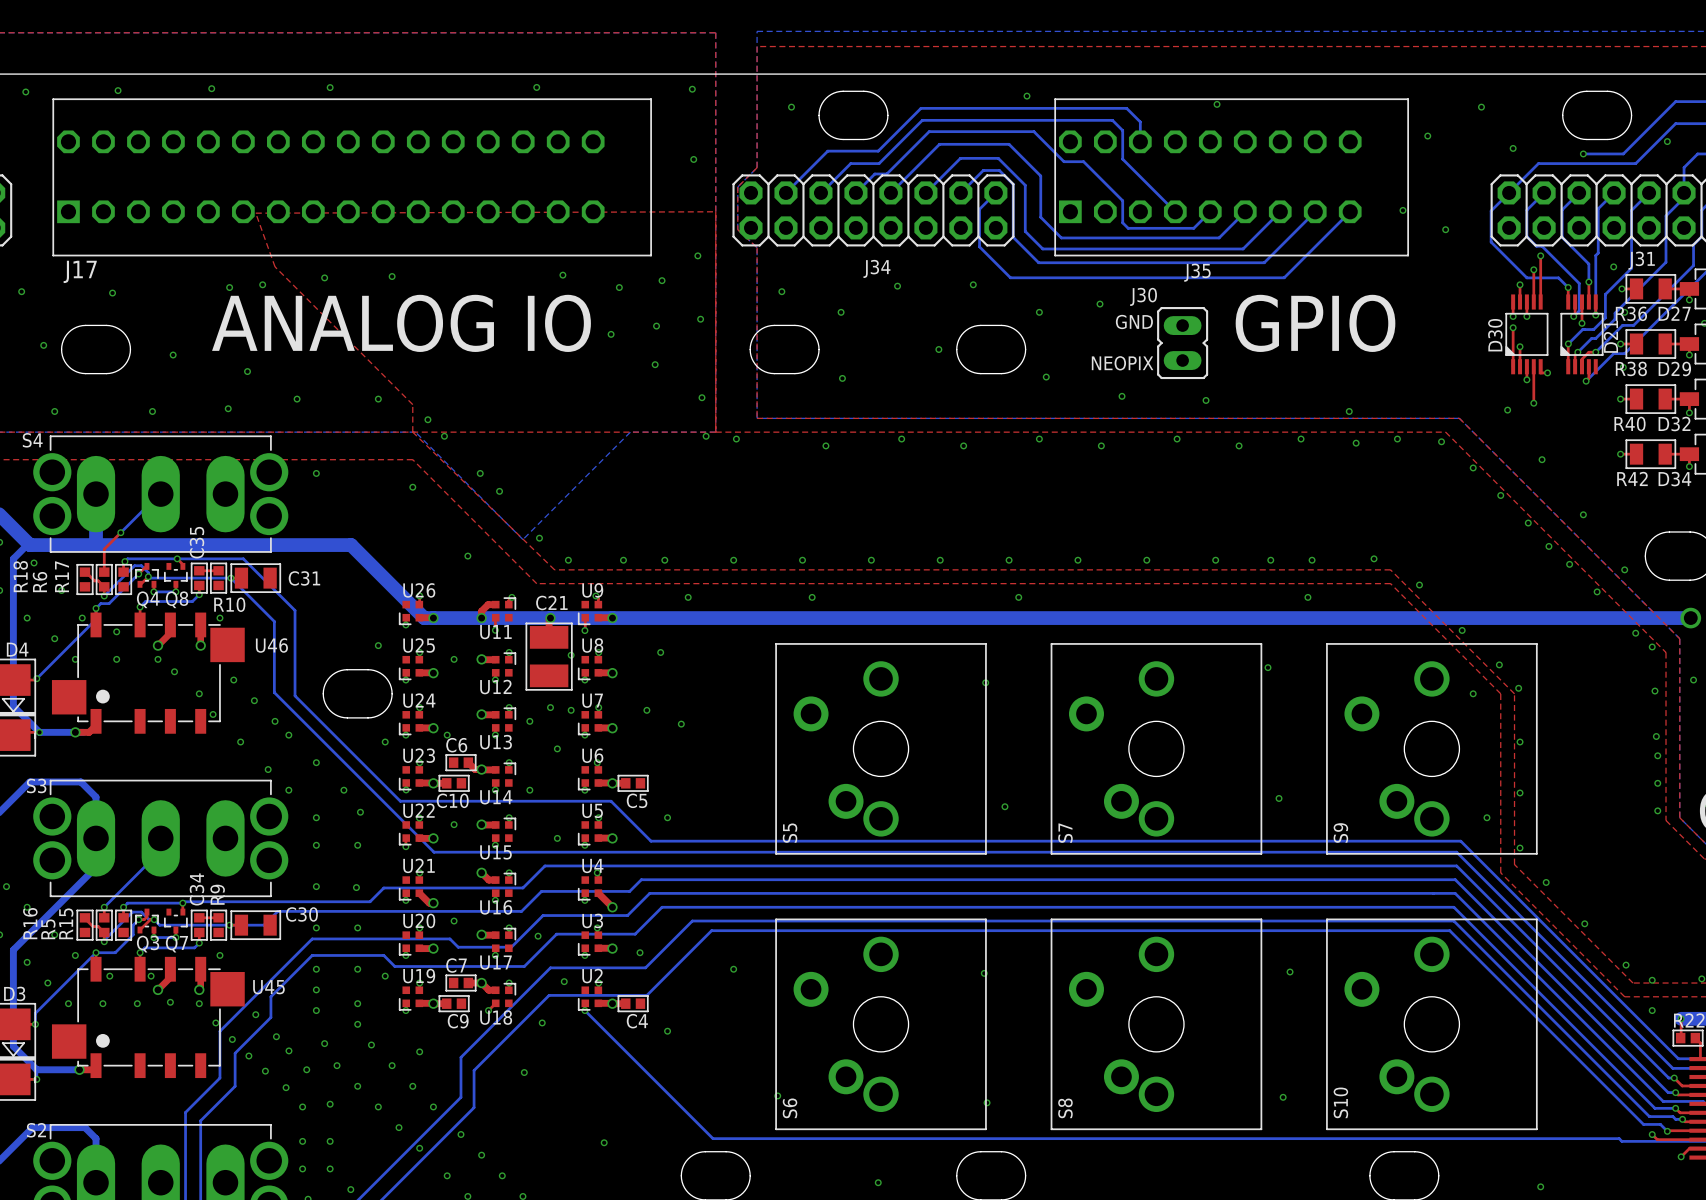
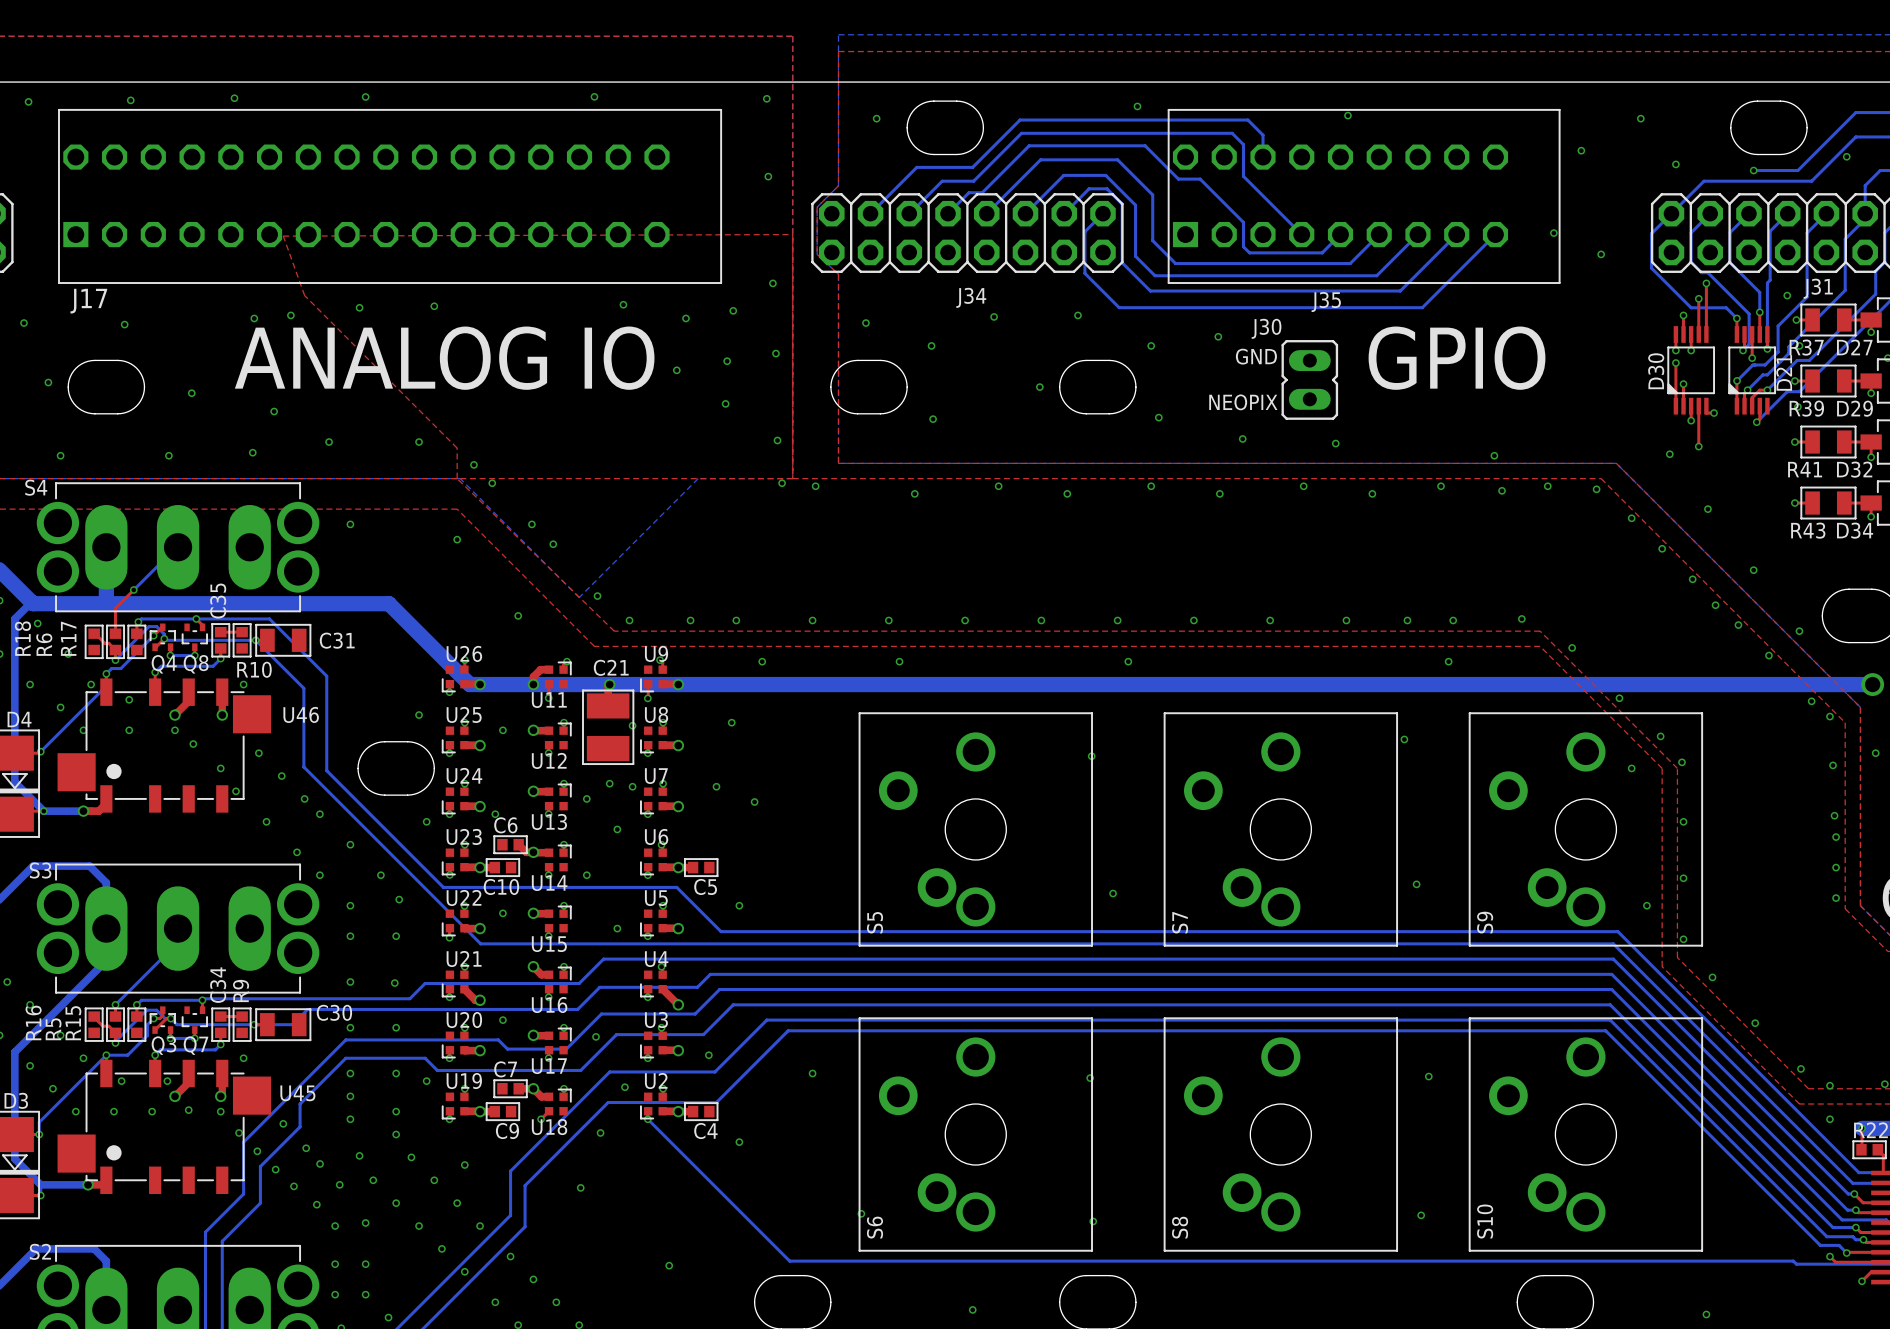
R36 name: R36 (1631, 313) -> R37 (1806, 347)
R38 name: R38 (1631, 368) -> R39 (1806, 408)
R40 name: R40 (1630, 424) -> R41 (1805, 469)
R42 name: R42 (1632, 478) -> R43 (1808, 530)

